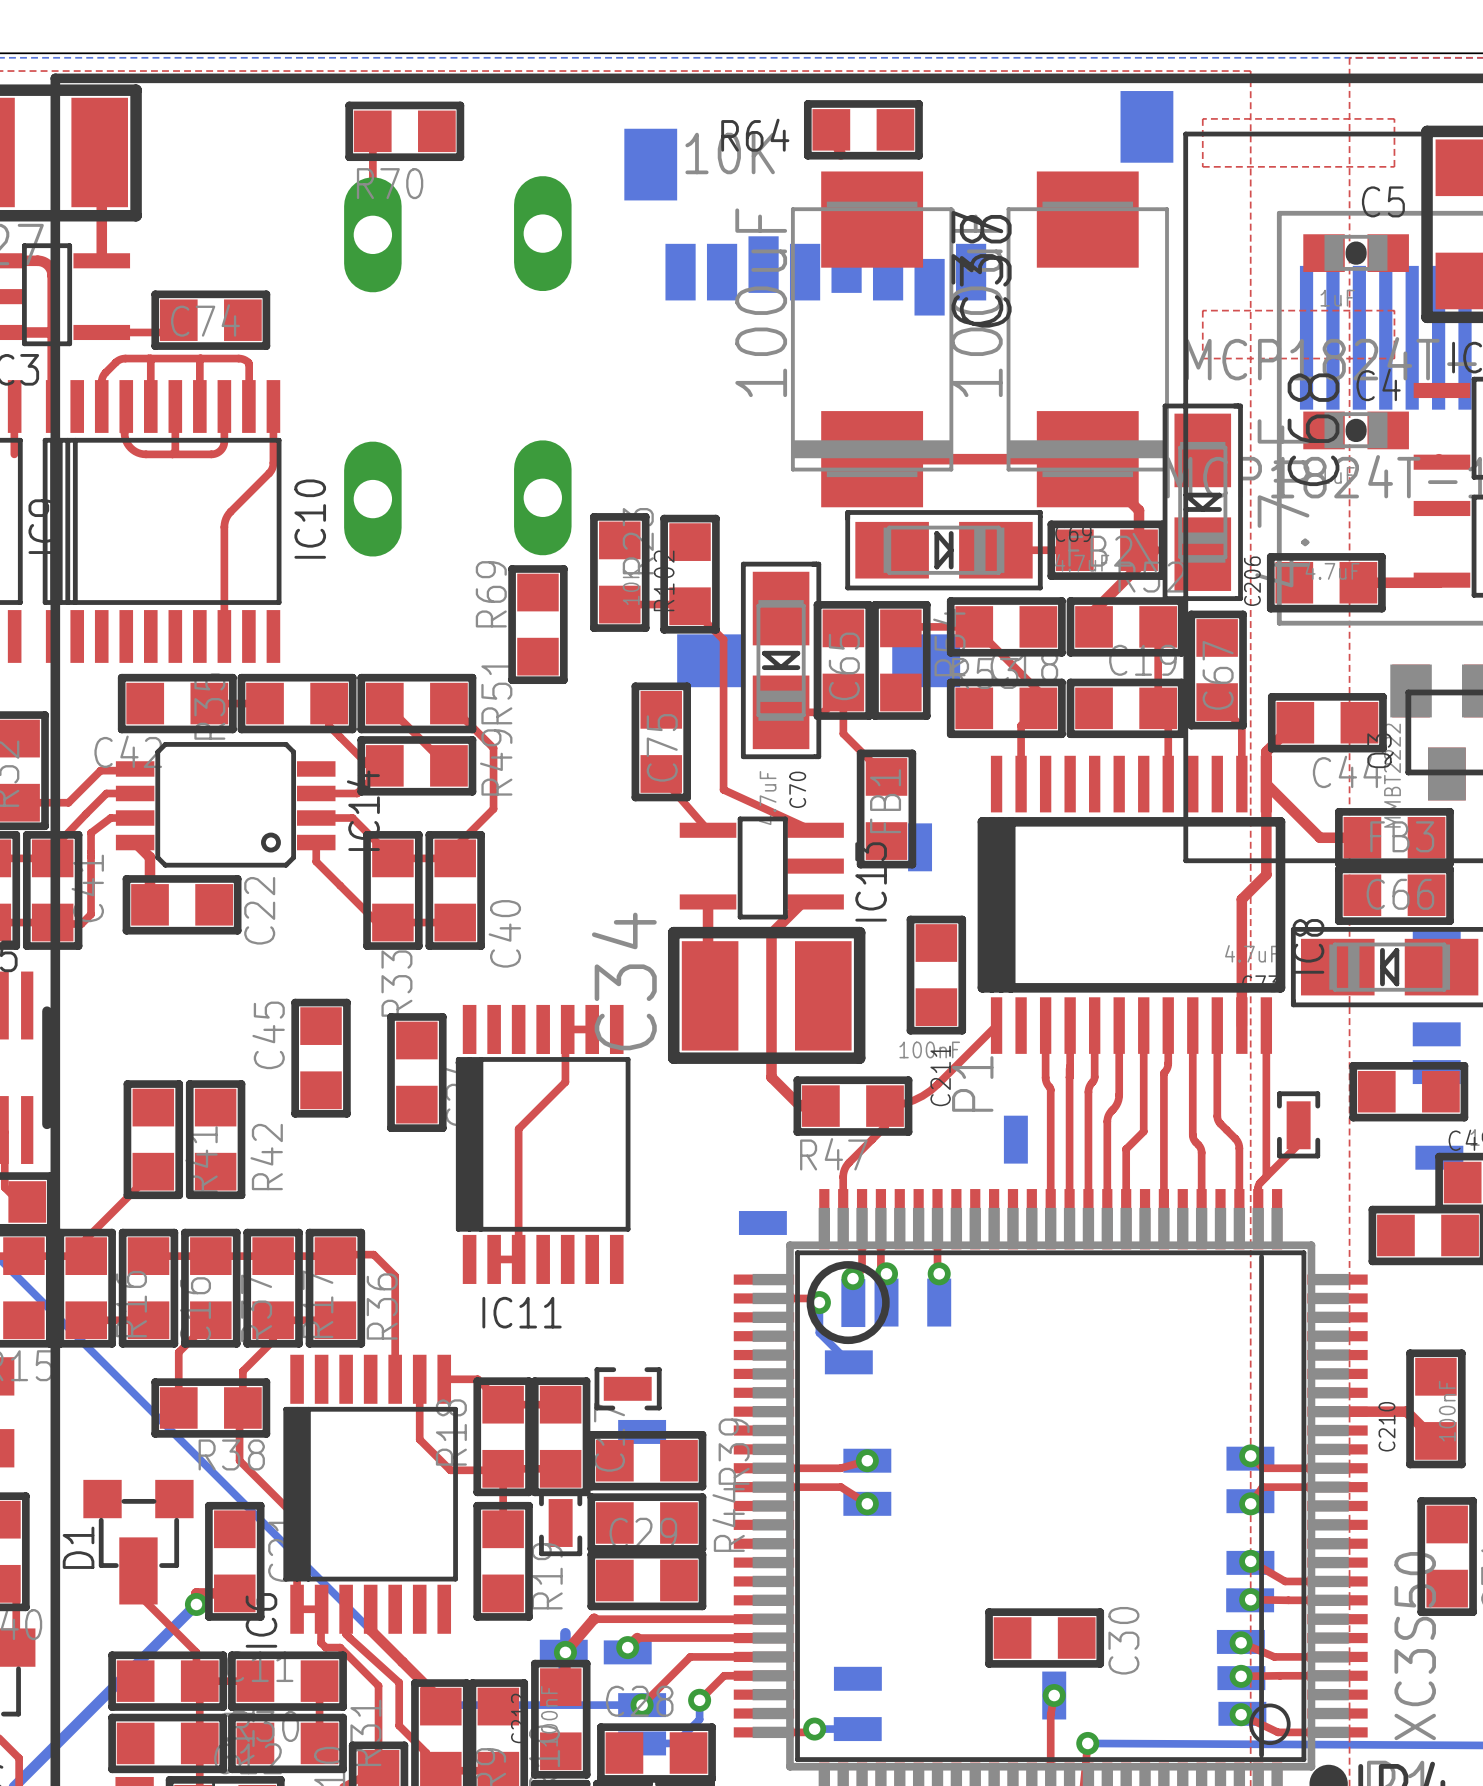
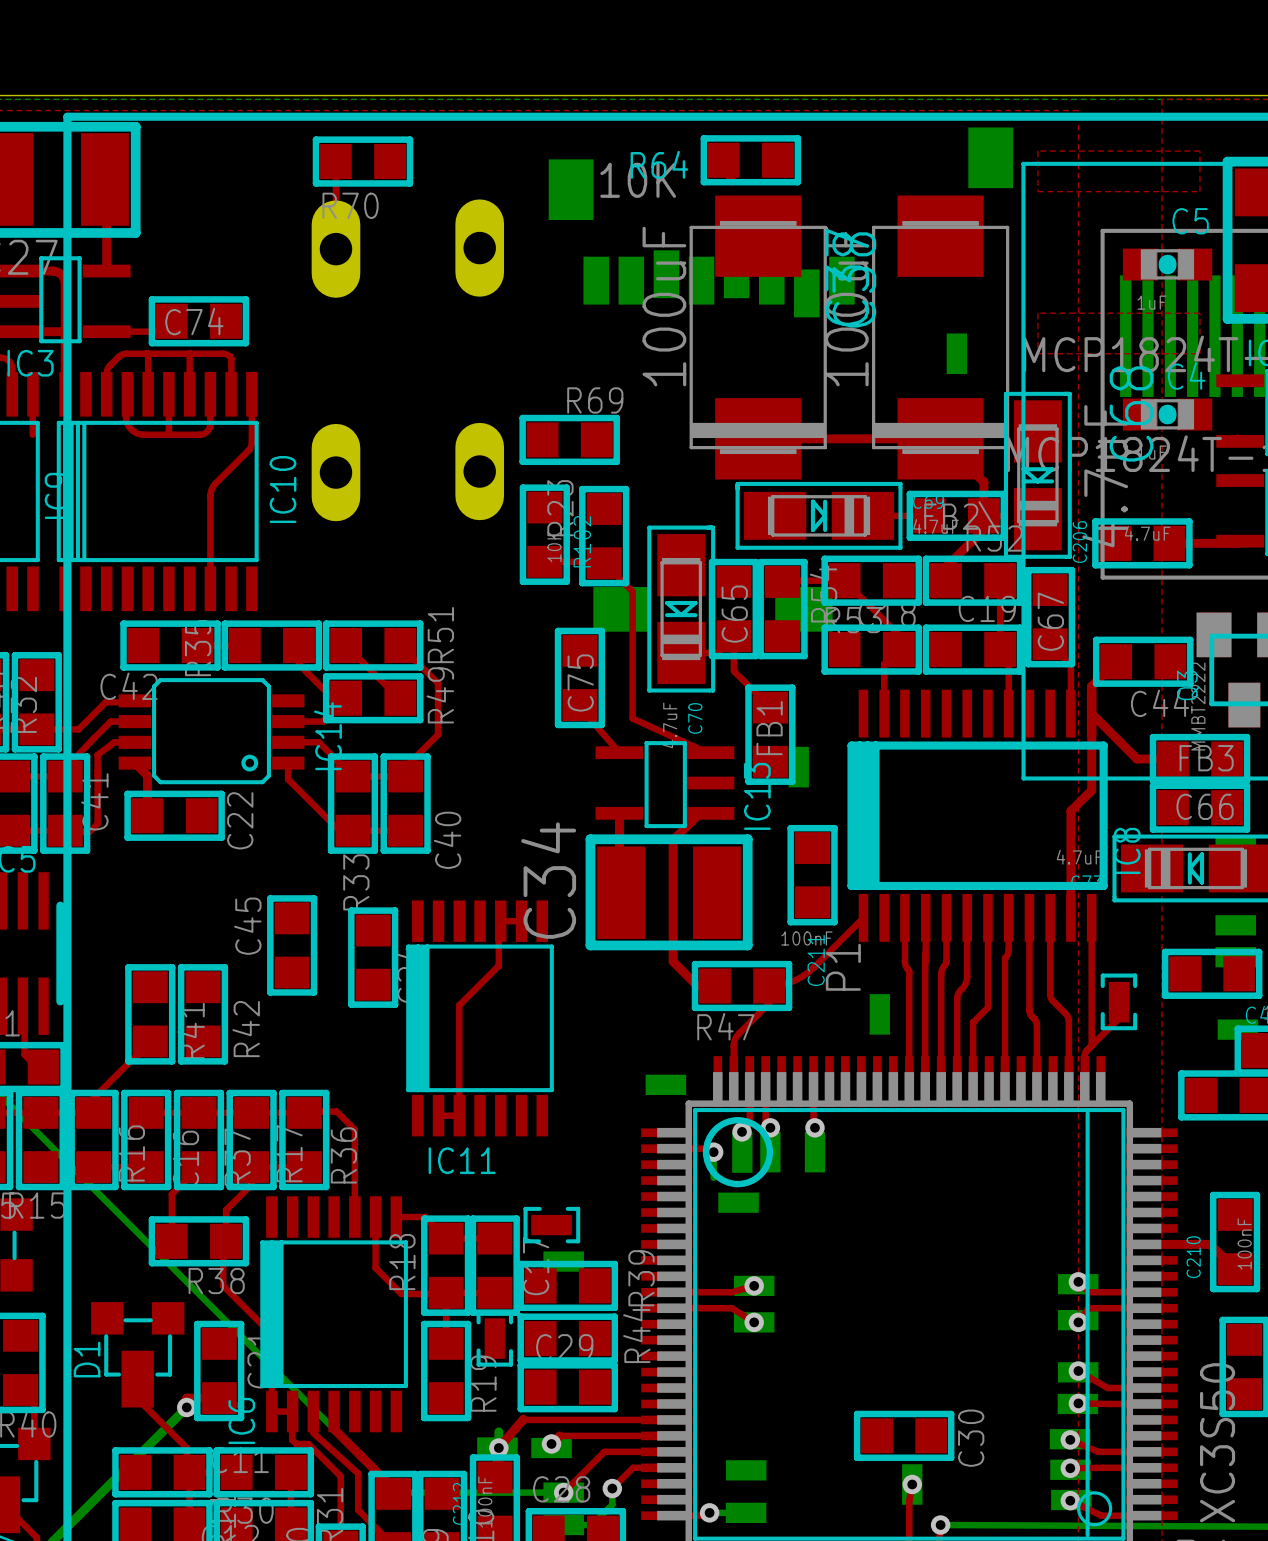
part: none -> (956, 353)
R69 rotation: 0° (537, 624) -> 90° clockwise (569, 439)
R69 position: (537, 624) -> (569, 439)
bottom track: (819, 1332) (848, 1362) -> none

